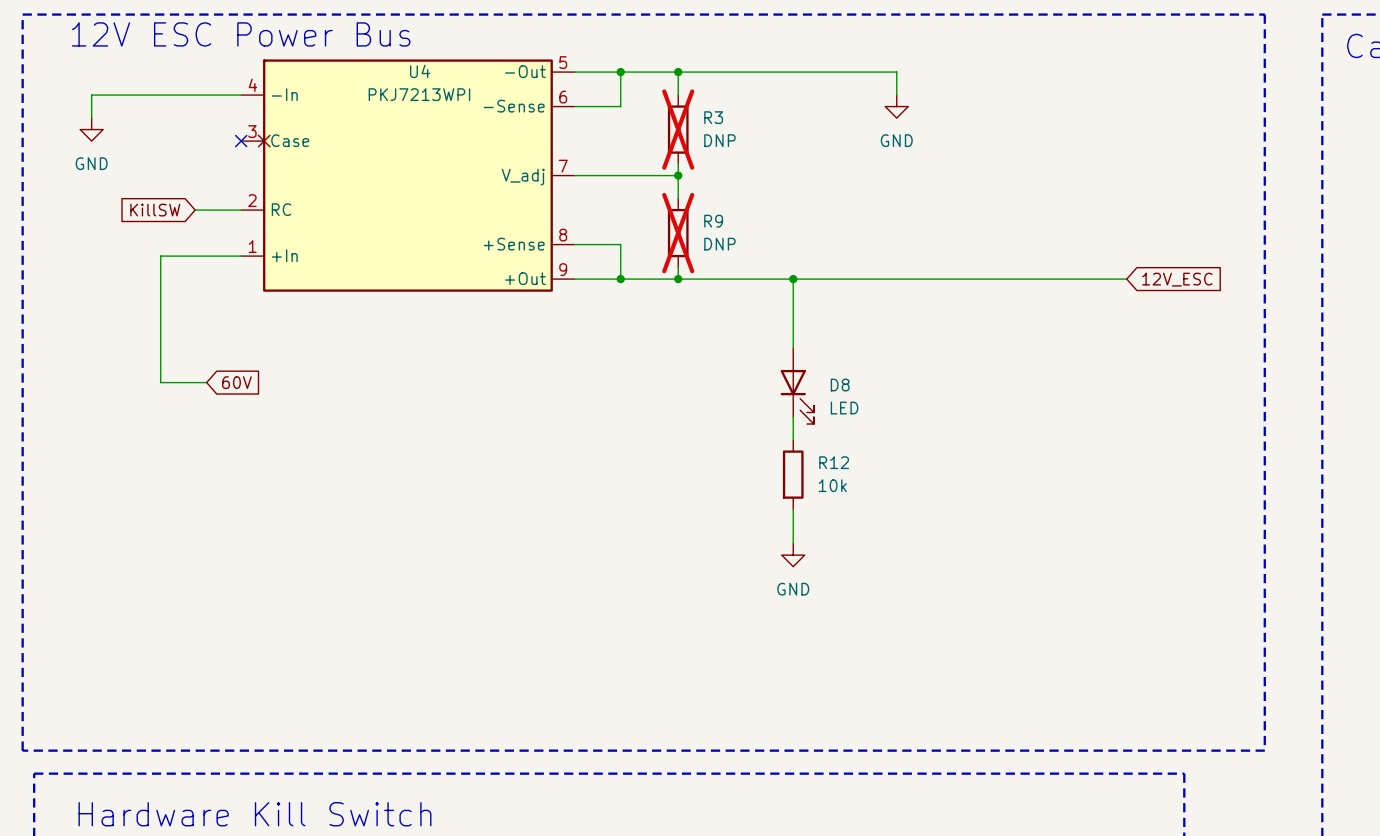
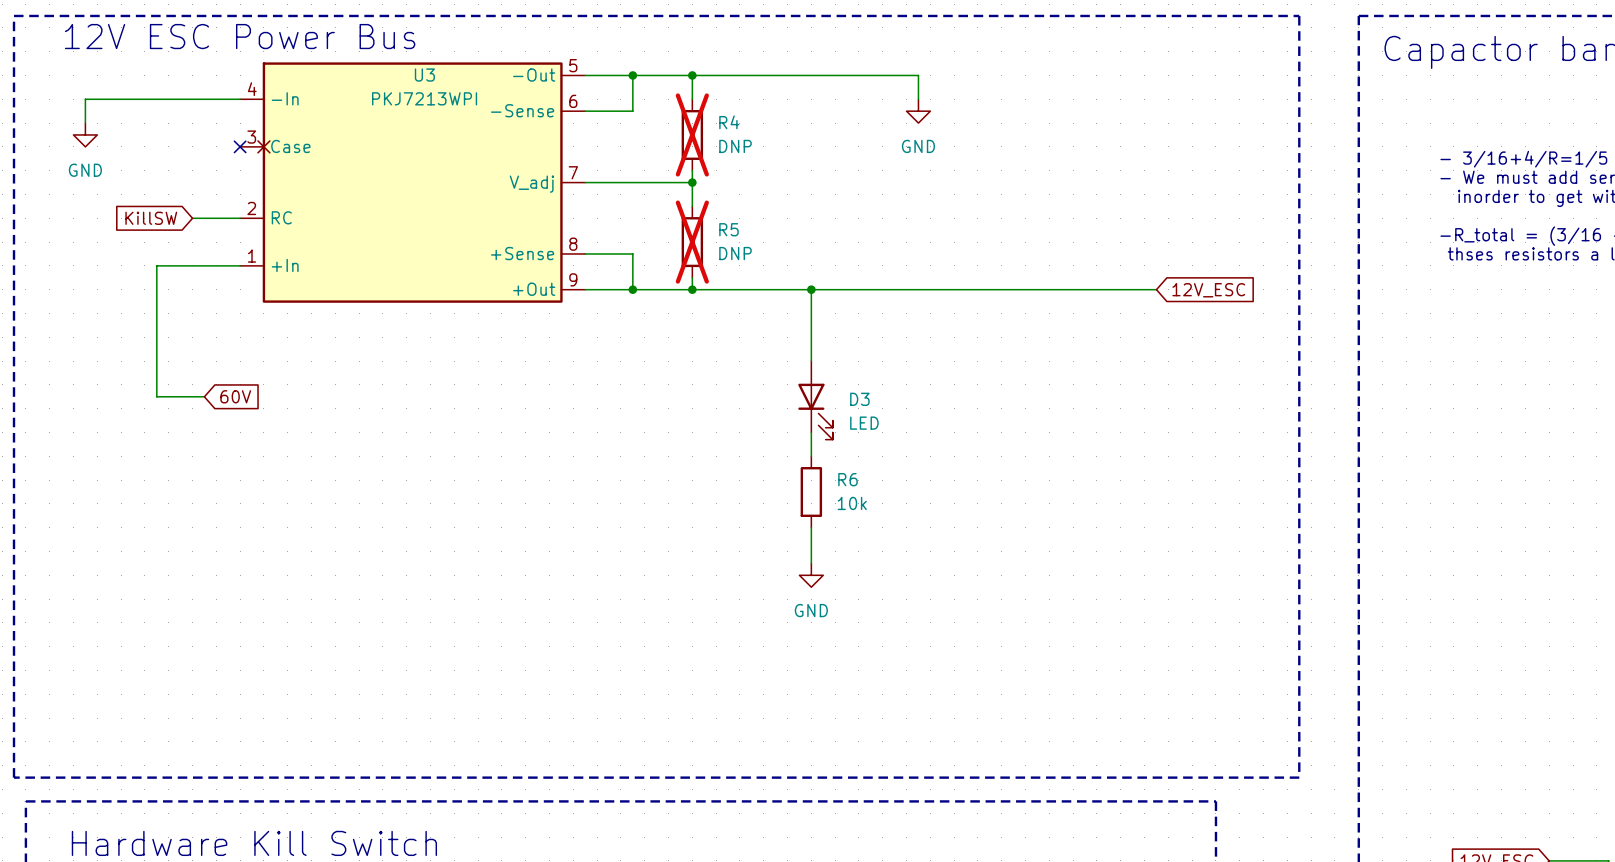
U4 name: U4 (420, 71) -> U3 (424, 75)
R3 name: R3 (713, 117) -> R4 (729, 122)
R9 name: R9 (713, 221) -> R5 (728, 229)
D8 name: D8 (840, 385) -> D3 (859, 399)
R12 name: R12 (834, 462) -> R6 (847, 479)

